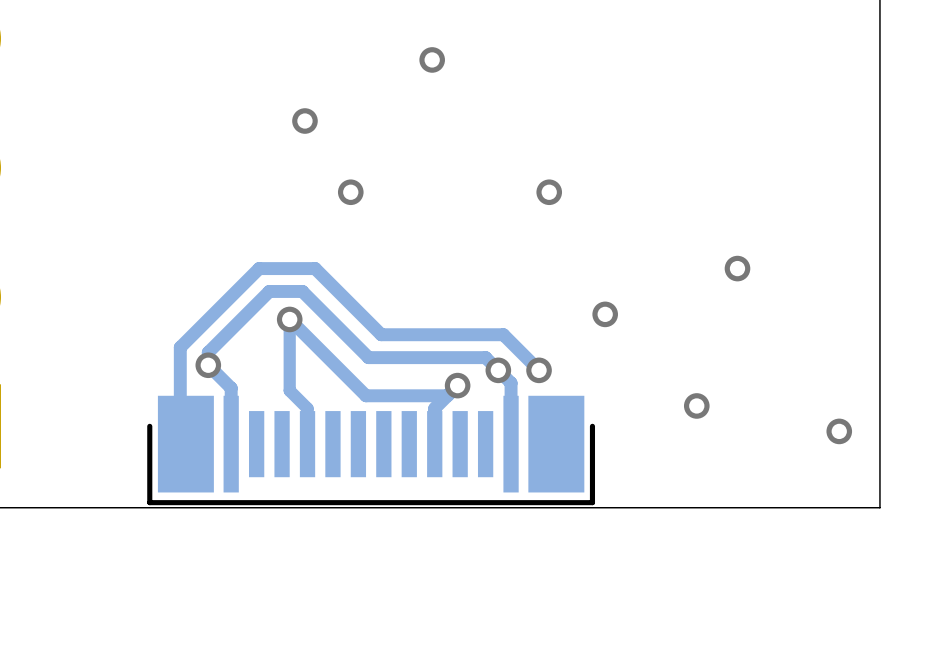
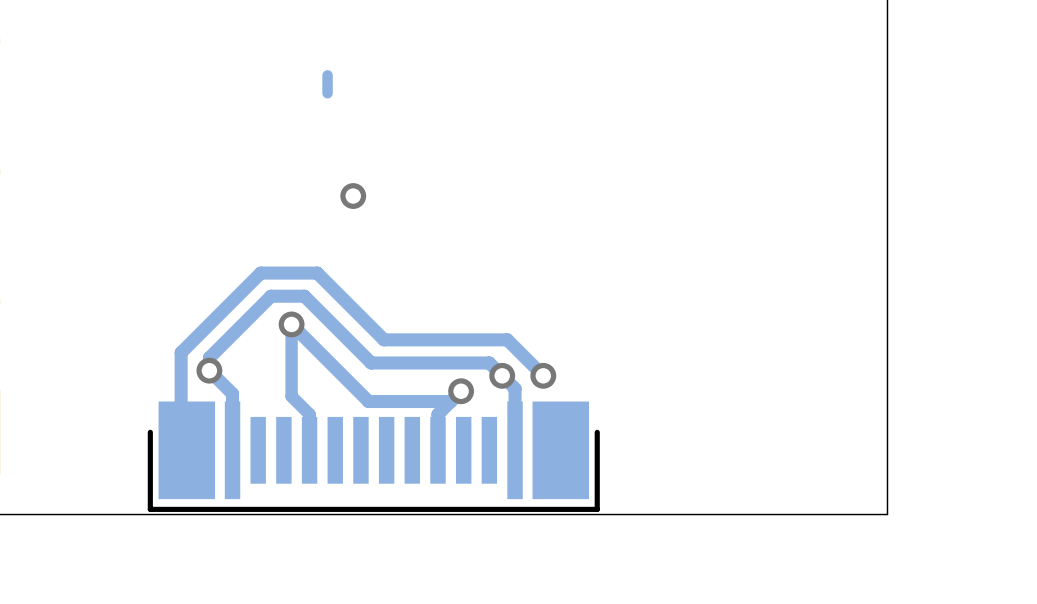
via: (432, 59) -> none
track: none -> (327, 75) (327, 93)
via: (304, 121) -> none
via: (549, 192) -> none
via: (737, 268) -> none
via: (605, 314) -> none
via: (696, 405) -> none
via: (839, 431) -> none

